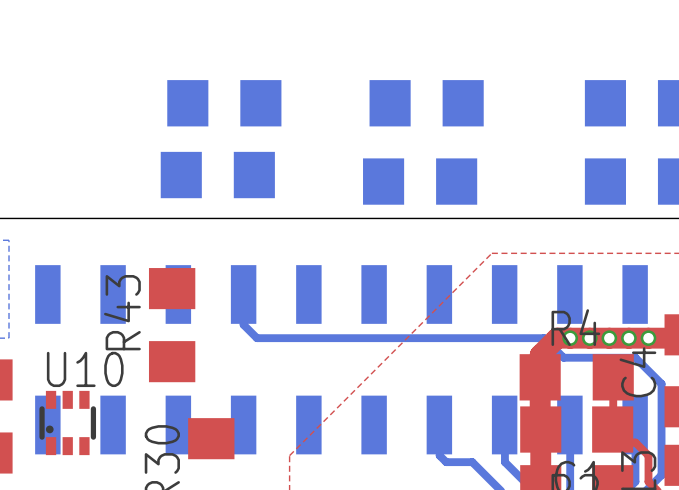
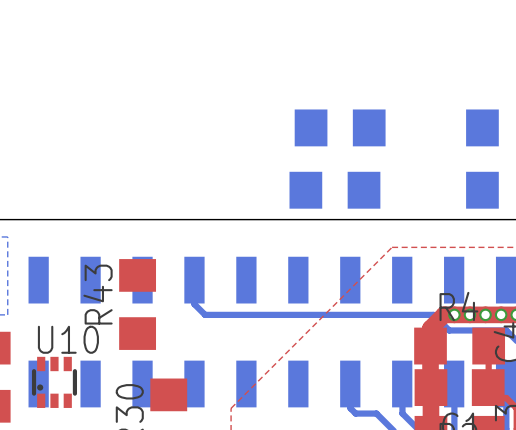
part: (224, 103) -> none
part: (217, 175) -> none

